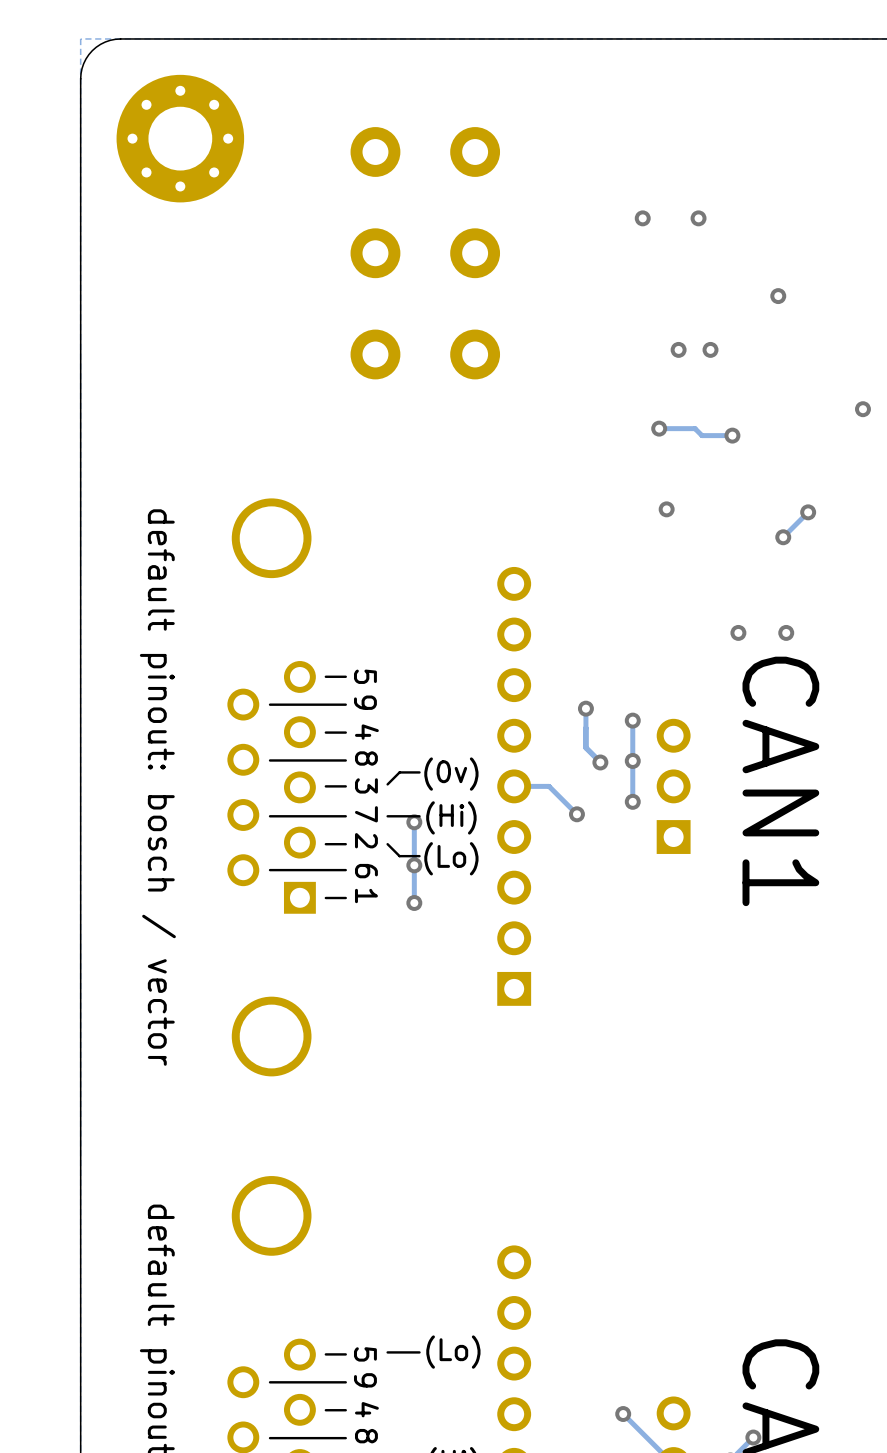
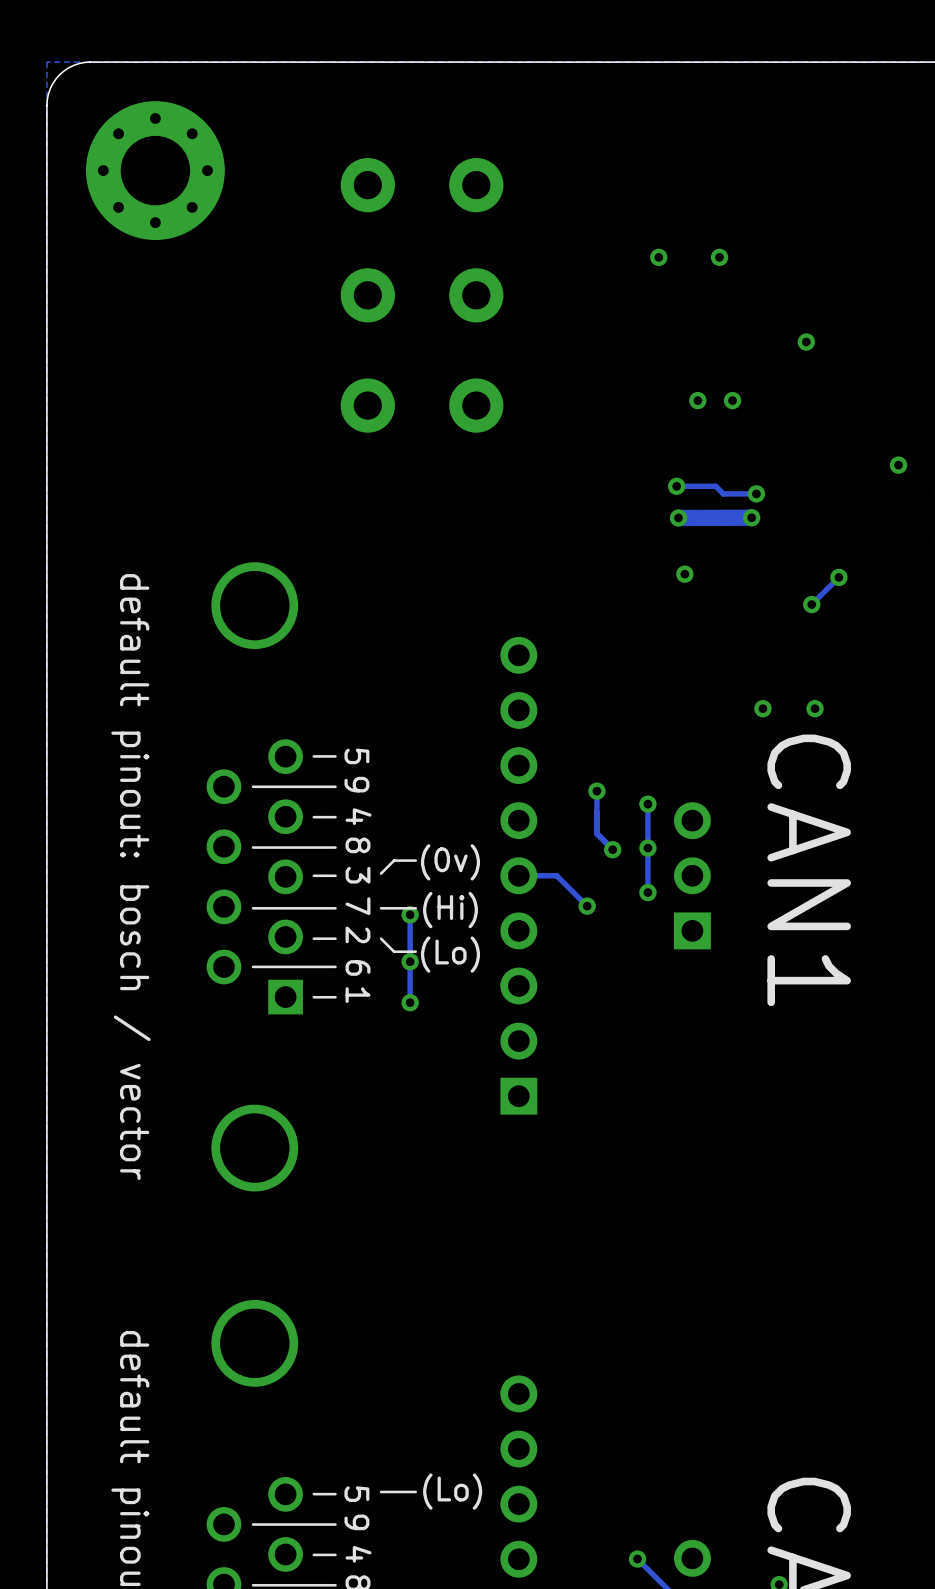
via: none -> (678, 517)
track: none -> (751, 517) (678, 517)
via: none -> (751, 517)

